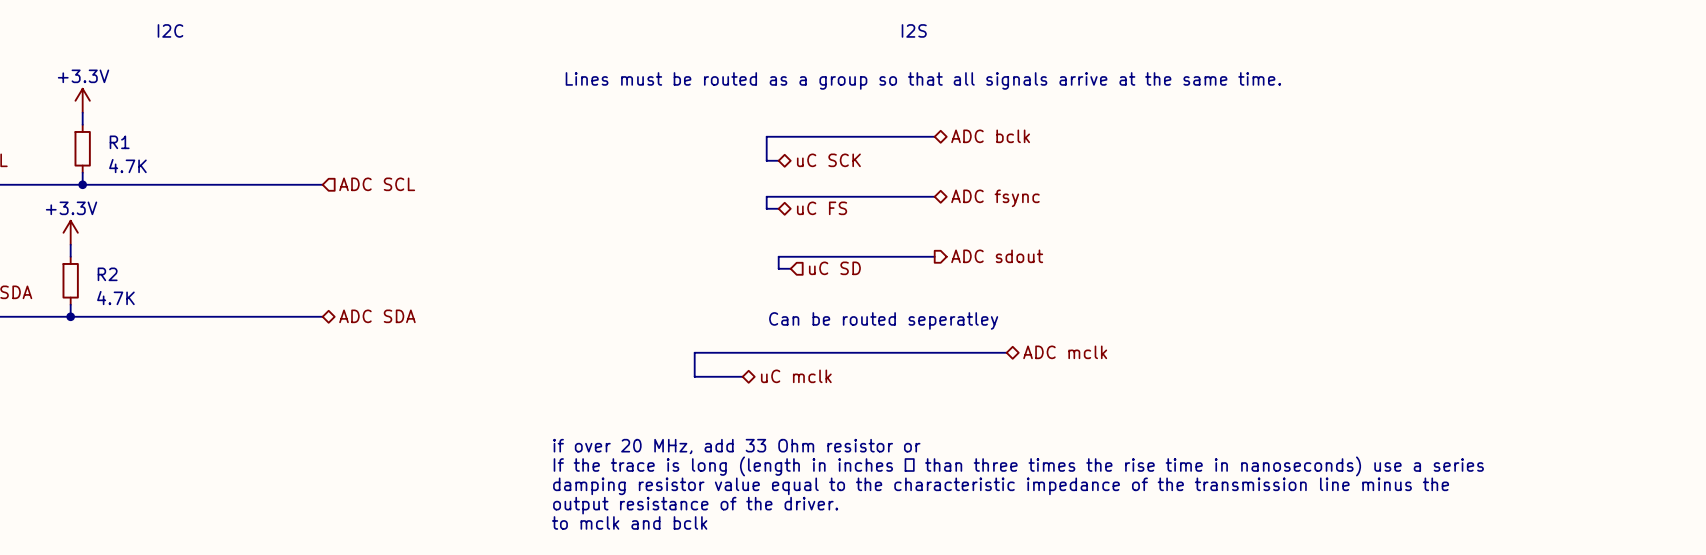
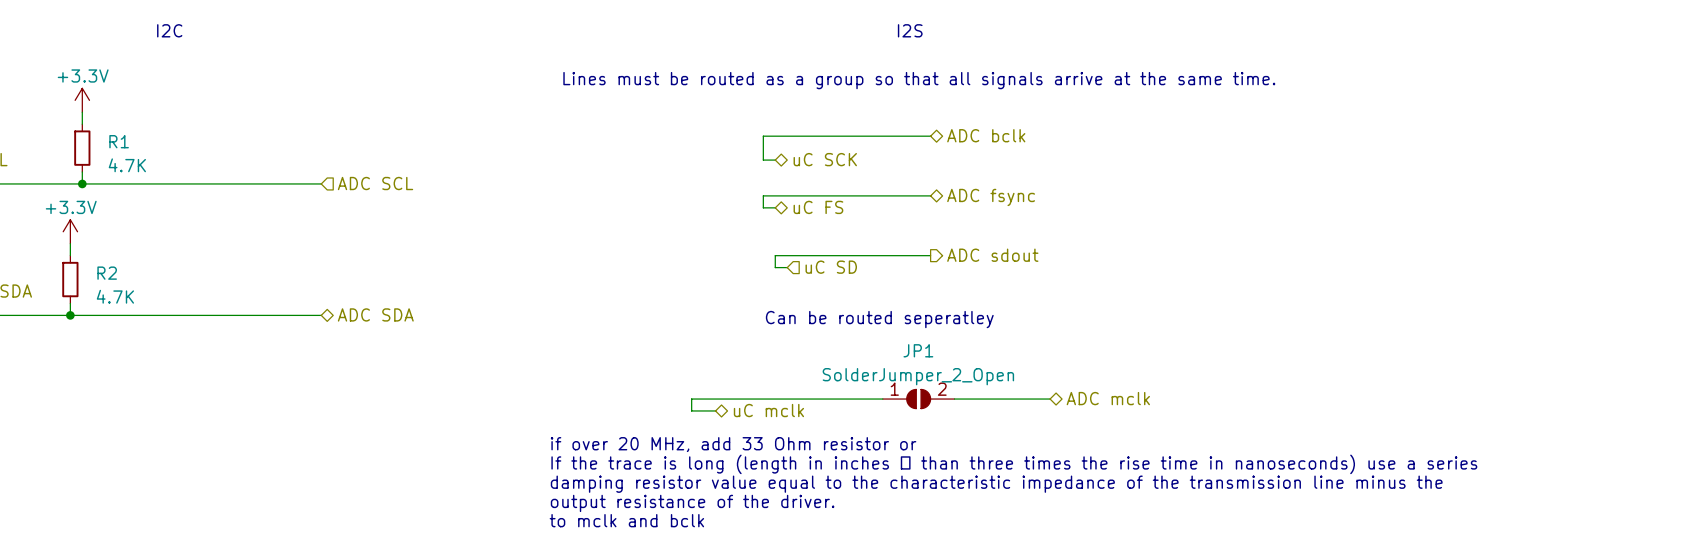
wire: (1006, 352) (694, 352) (694, 376) (742, 376) -> none
hierarchical label position: ADC mclk (1065, 352) -> ADC mclk (1108, 398)
hierarchical label position: uC mclk (796, 376) -> uC mclk (768, 410)
wire: none -> (882, 399) (691, 399) (691, 410) (715, 410)
JP1: none -> SolderJumper_2_Open (918, 399)
wire: none -> (954, 399) (1050, 399)

